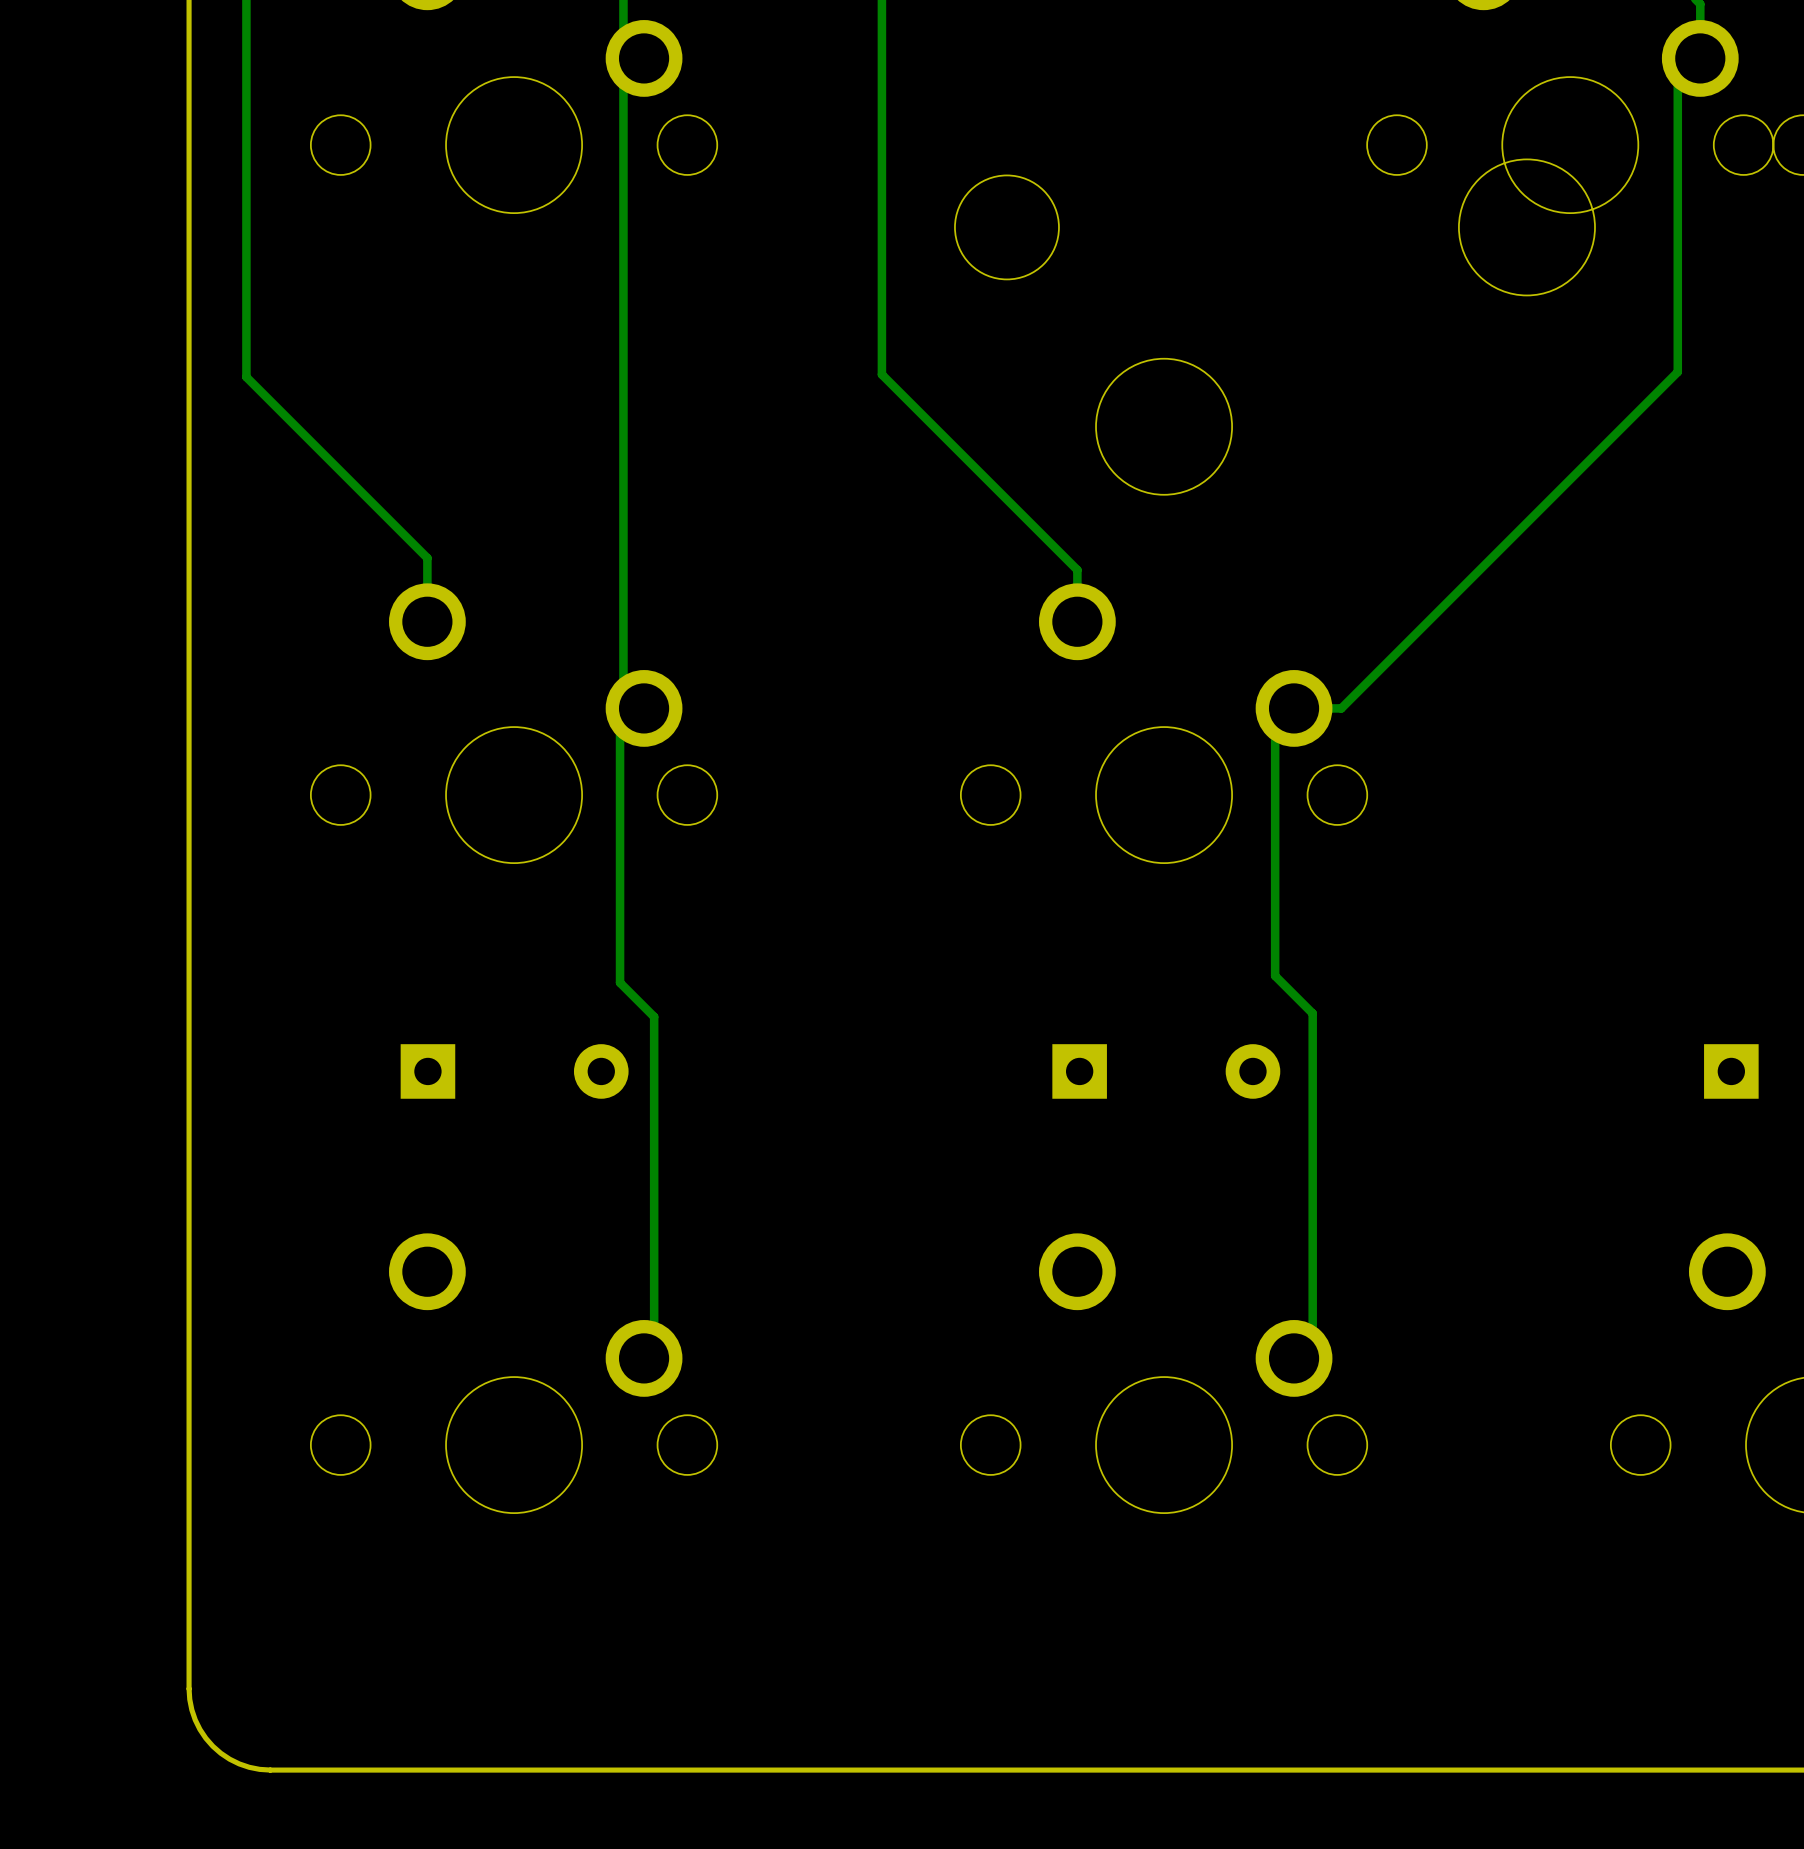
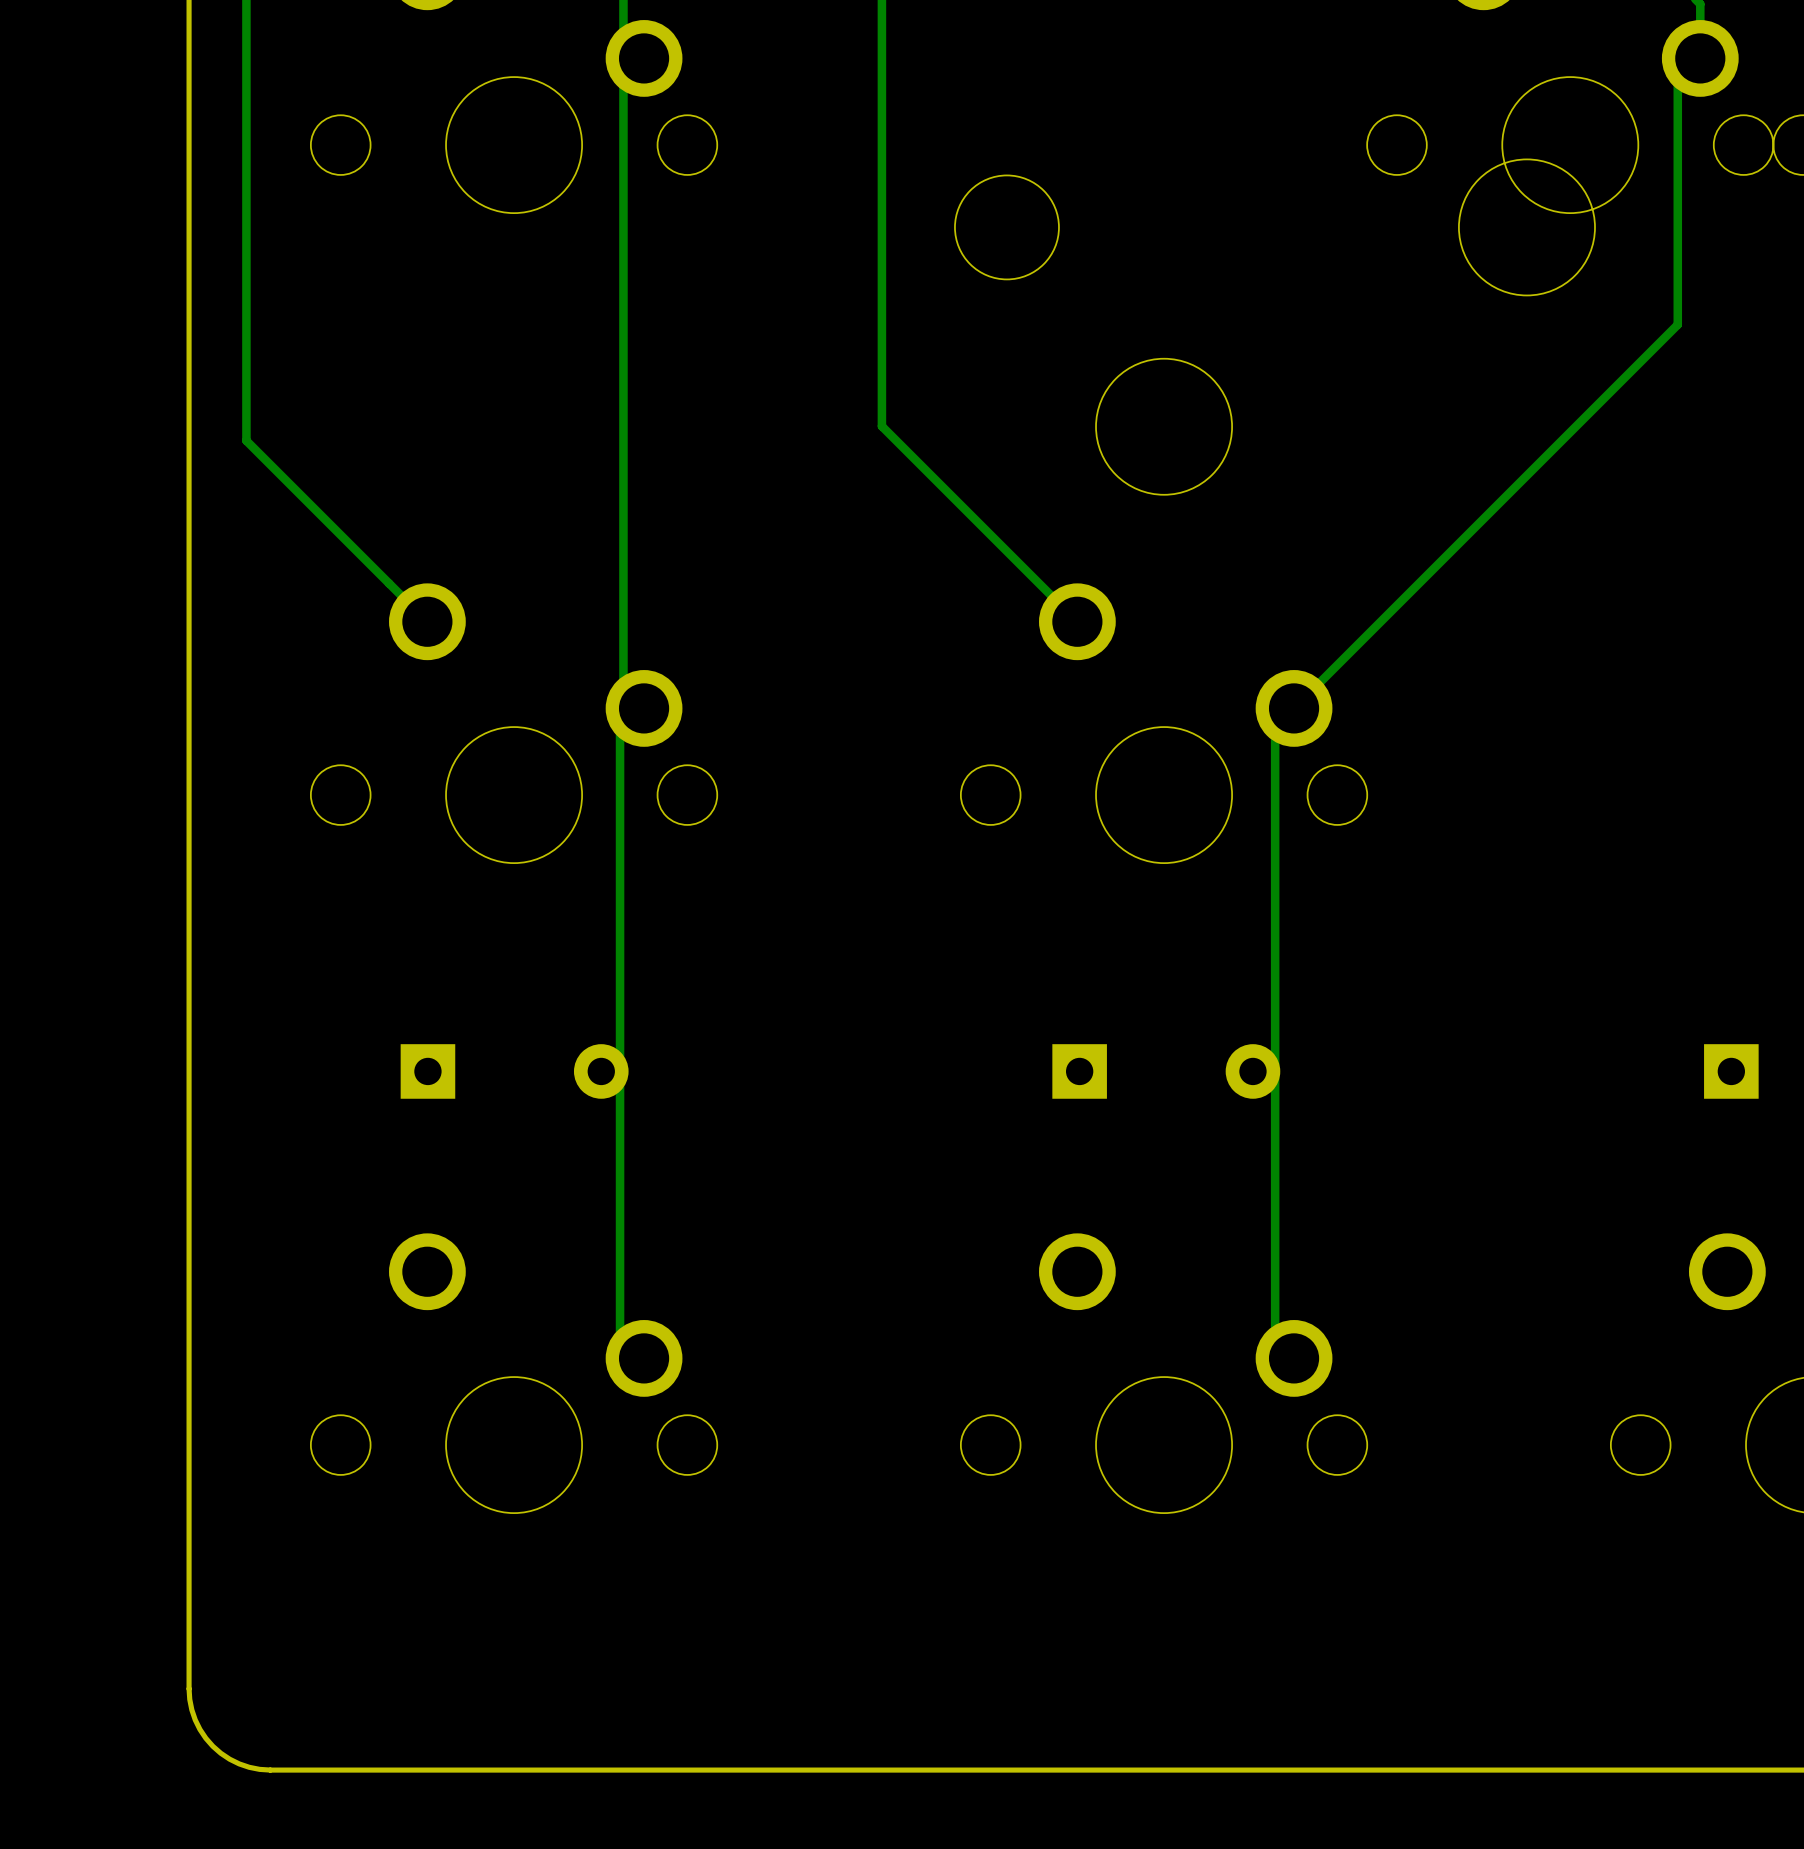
track: (1677, 324) (1677, 372) (1341, 708) (1294, 708) -> (1677, 324) (1294, 708)
track: (881, 374) (1077, 570) (1077, 621) -> (881, 374) (881, 426) (1077, 621)
track: (246, 377) (427, 558) (427, 621) -> (246, 377) (246, 440) (427, 621)
track: (1275, 975) (1312, 1013) (1312, 1339) (1294, 1358) -> (1275, 975) (1275, 1339) (1294, 1358)
track: (620, 982) (654, 1016) (654, 1348) (644, 1358) -> (620, 982) (620, 1334) (644, 1358)

